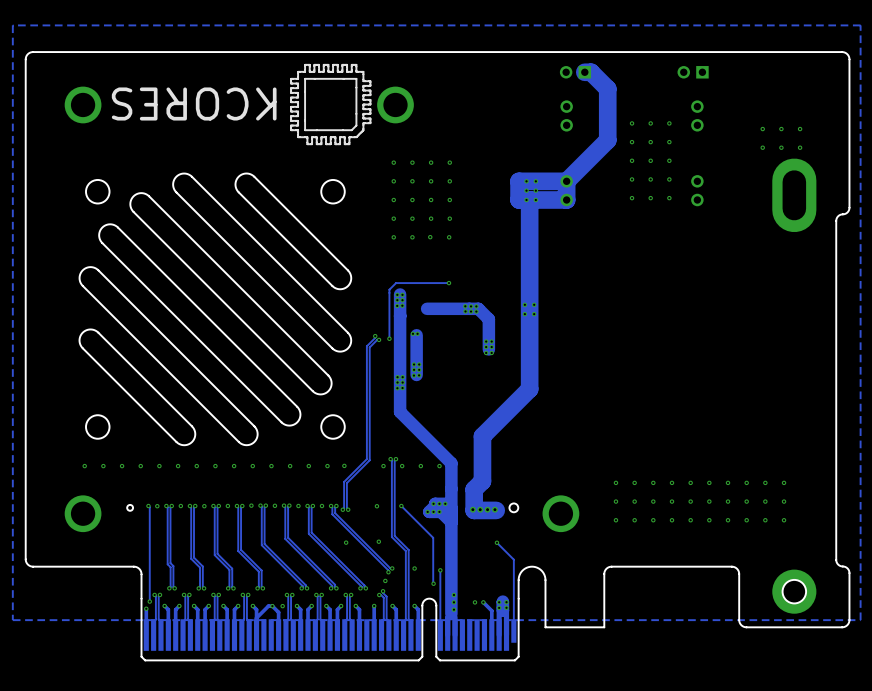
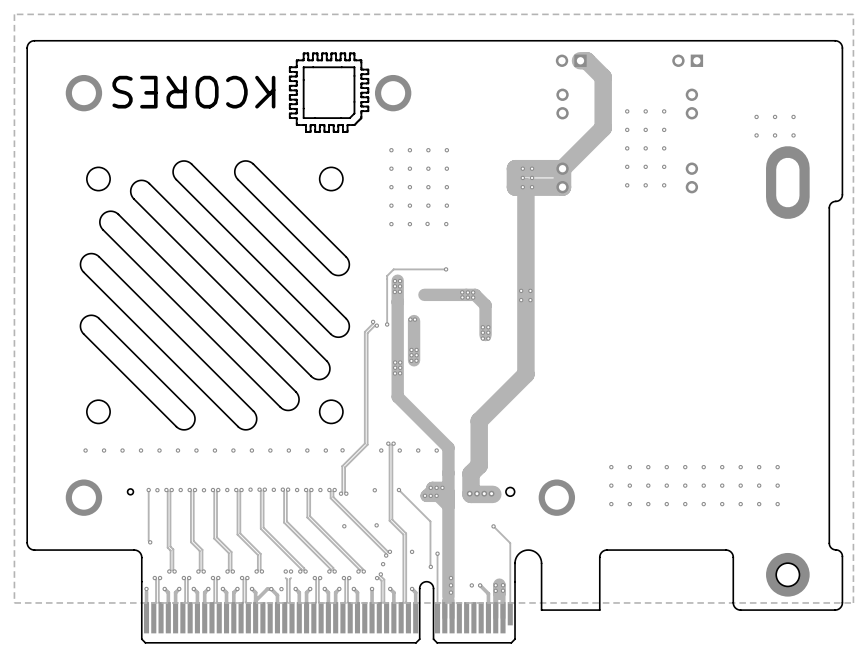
track: (148, 506) (149, 601) -> (148, 490) (150, 542)
via: none -> (150, 542)
via: none -> (285, 571)
via: none -> (291, 571)
via: (286, 594) -> none
via: (292, 594) -> none
via: (149, 601) -> none
via: none -> (146, 588)
via: (146, 608) -> none

